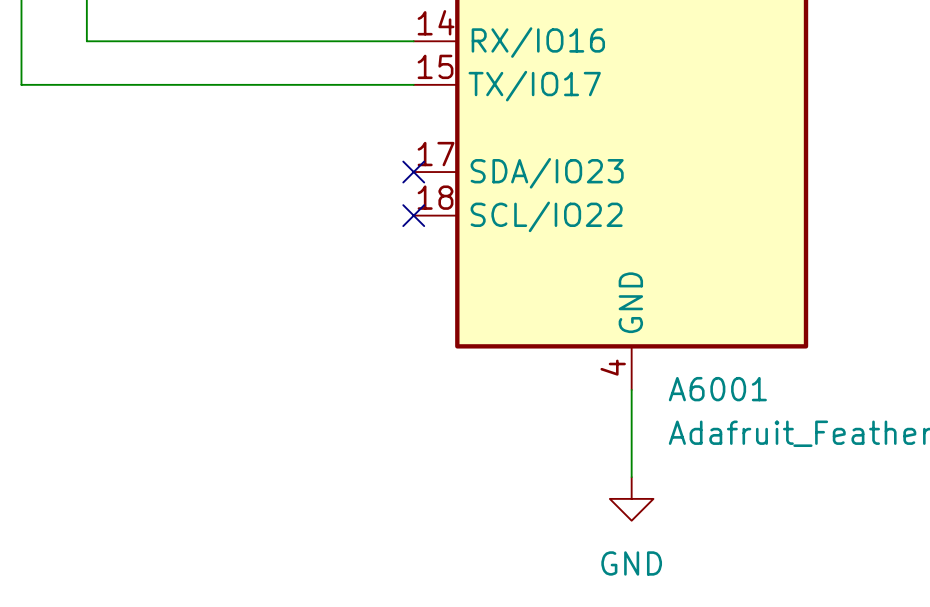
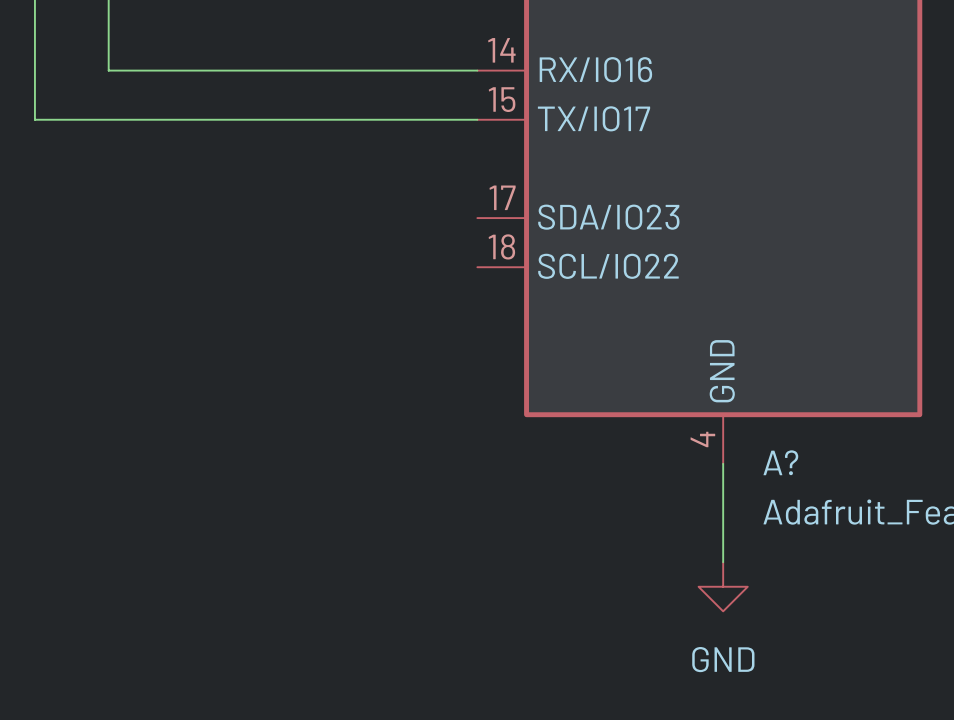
no-connect mark: (413, 172) -> none
no-connect mark: (413, 215) -> none
A6001 name: A6001 (717, 389) -> A? (780, 462)

